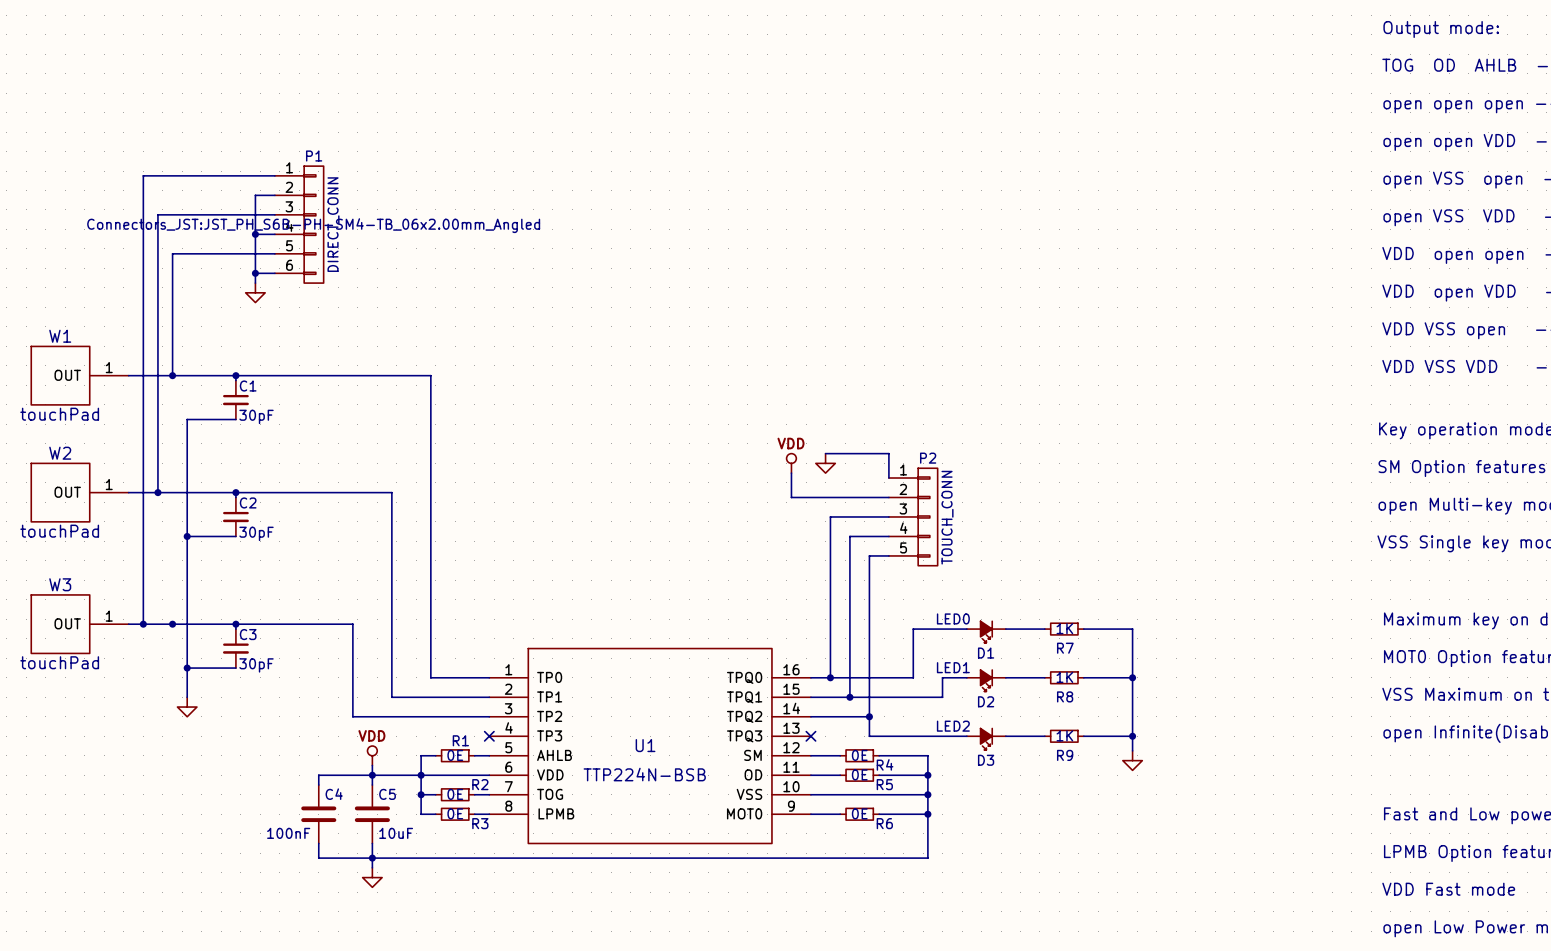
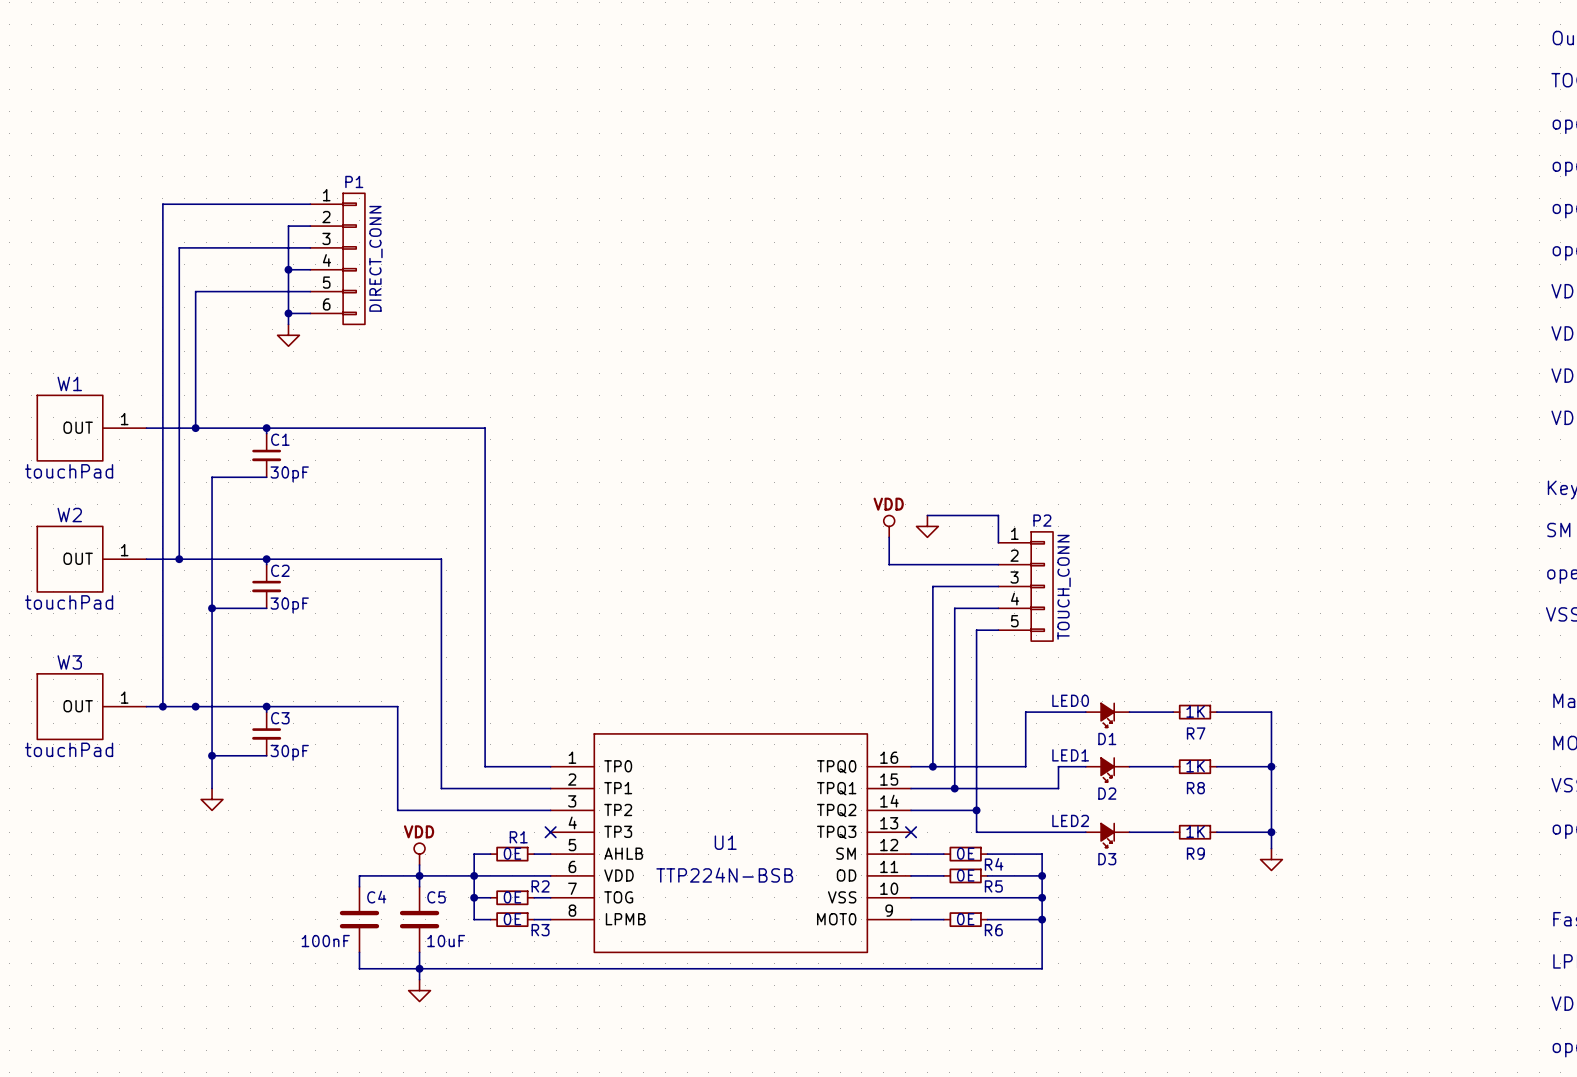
P1 text: Connectors_JST:JST_PH_S6B-PH-SM4-TB_06x2.00mm_Angled (313, 225) -> none

